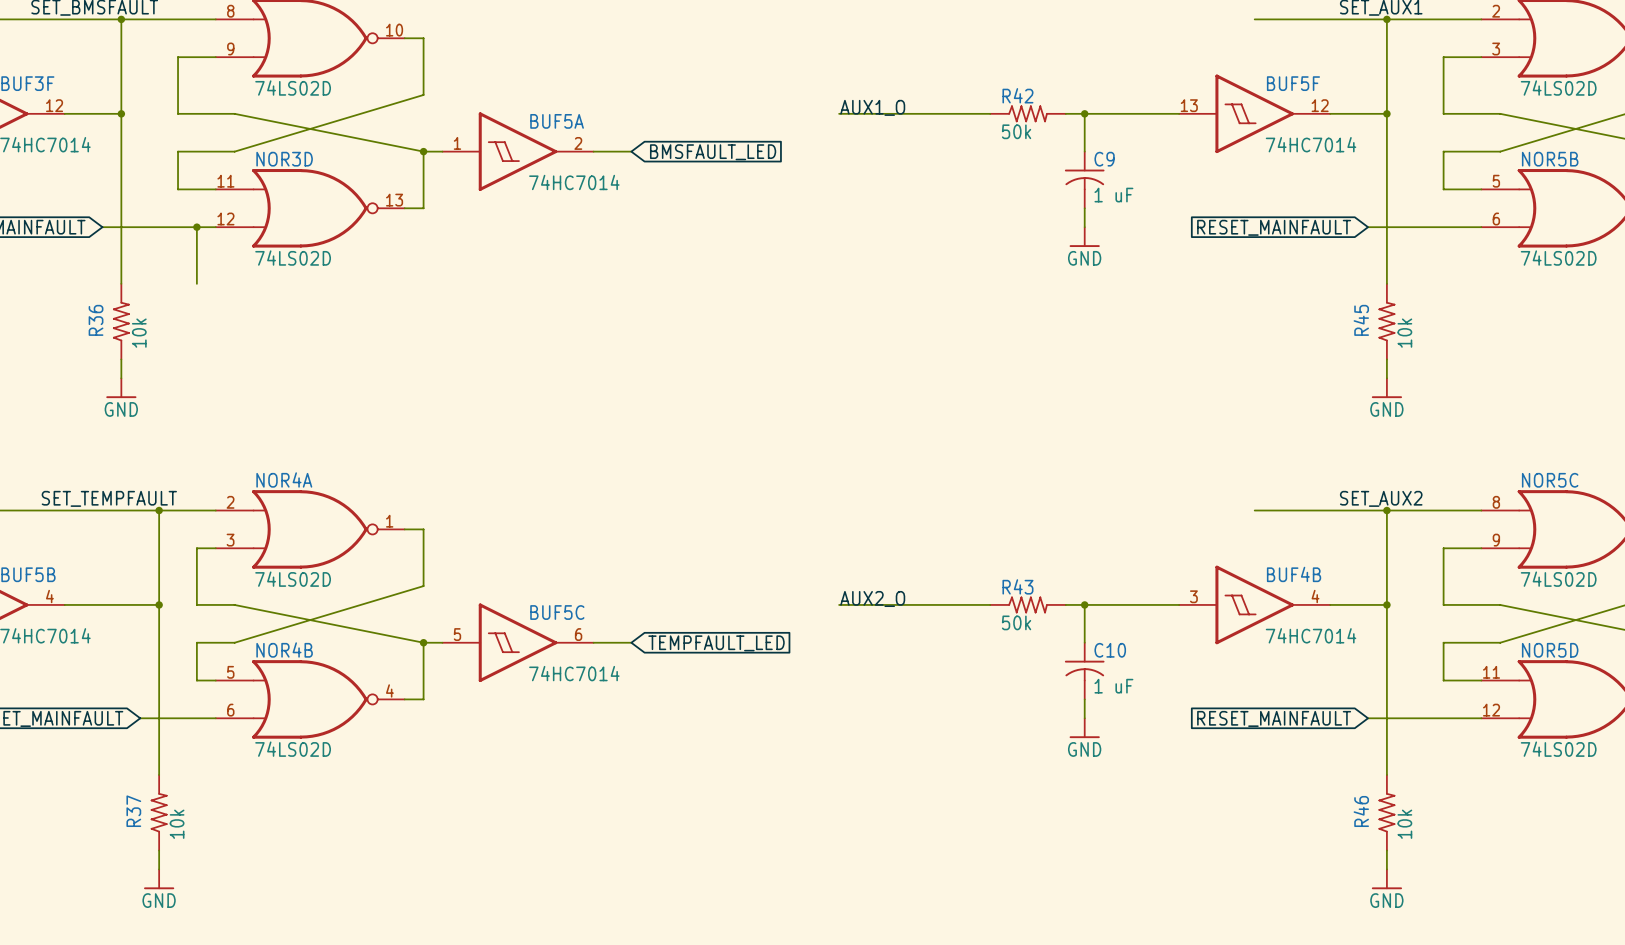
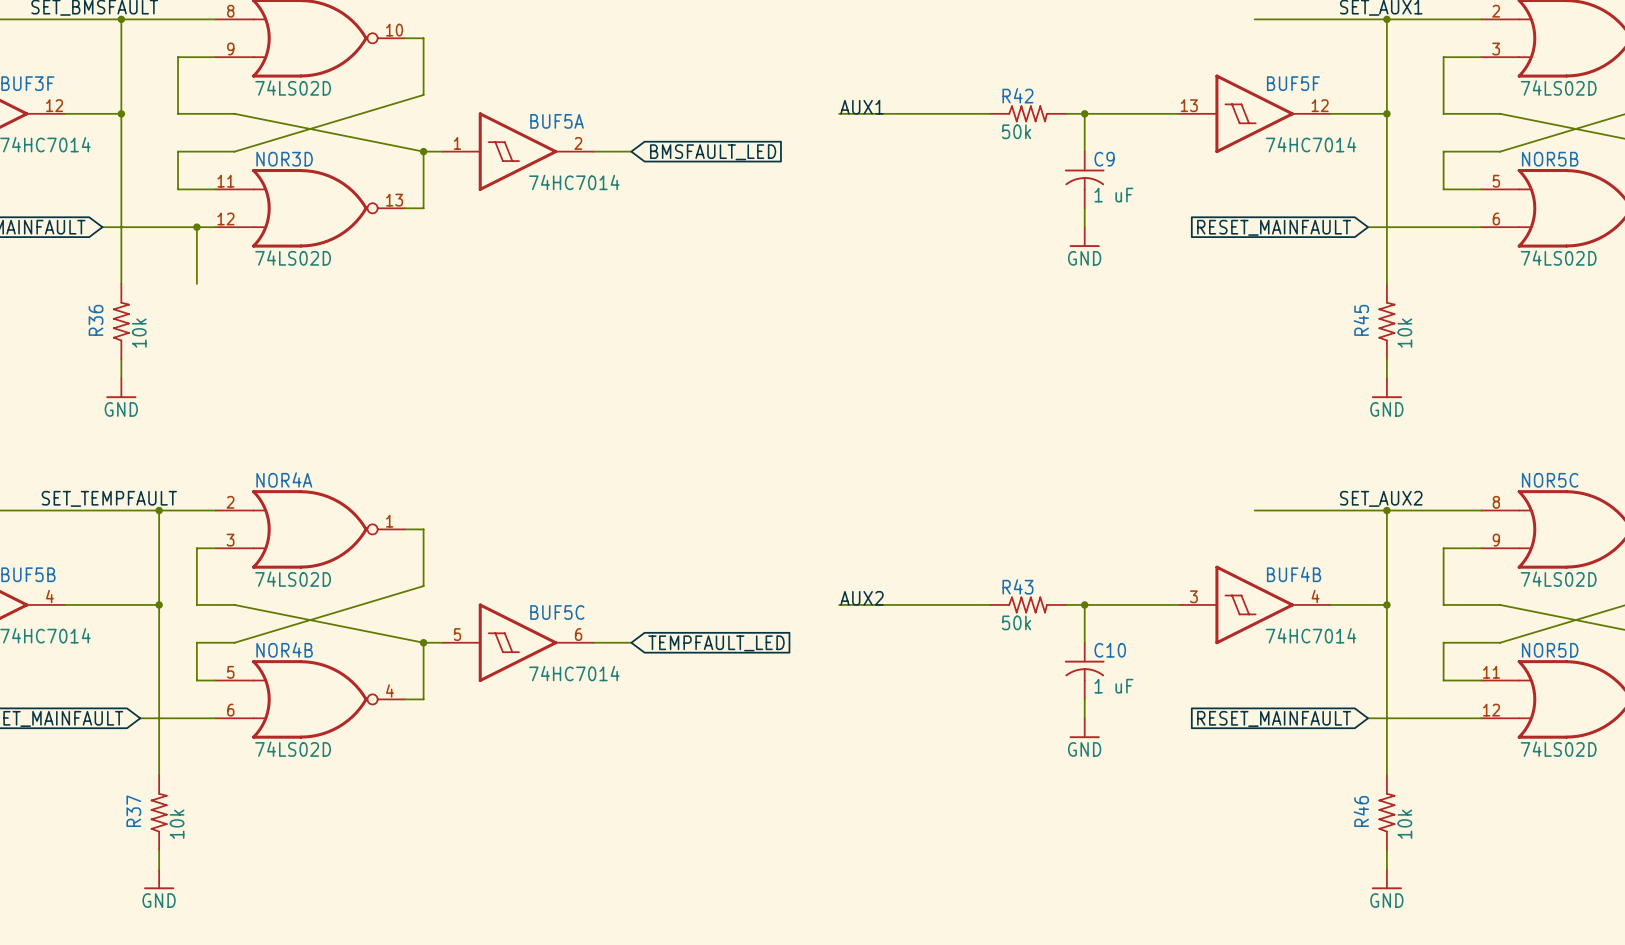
label: AUX1_O (872, 107) -> AUX1 (861, 107)
label: AUX2_O (872, 598) -> AUX2 (861, 598)

